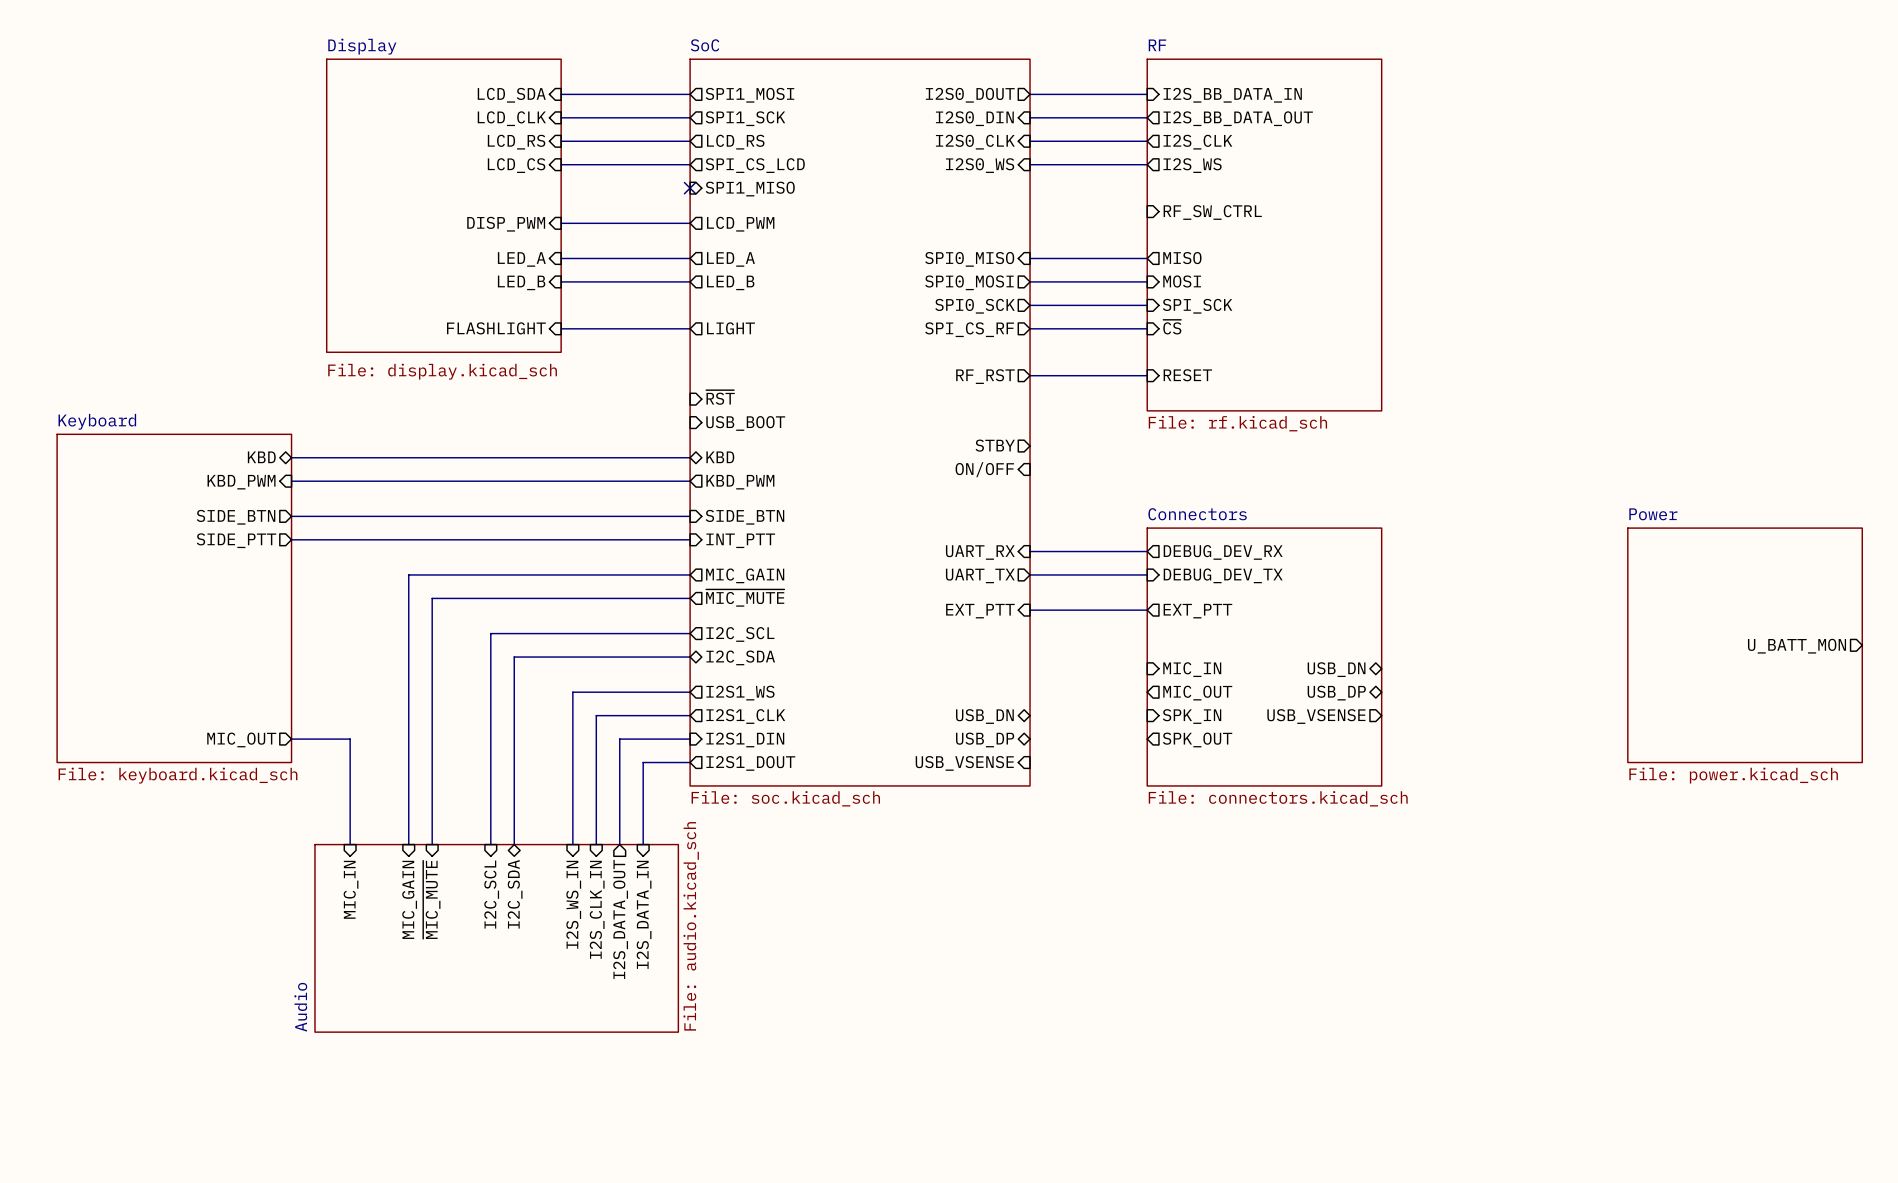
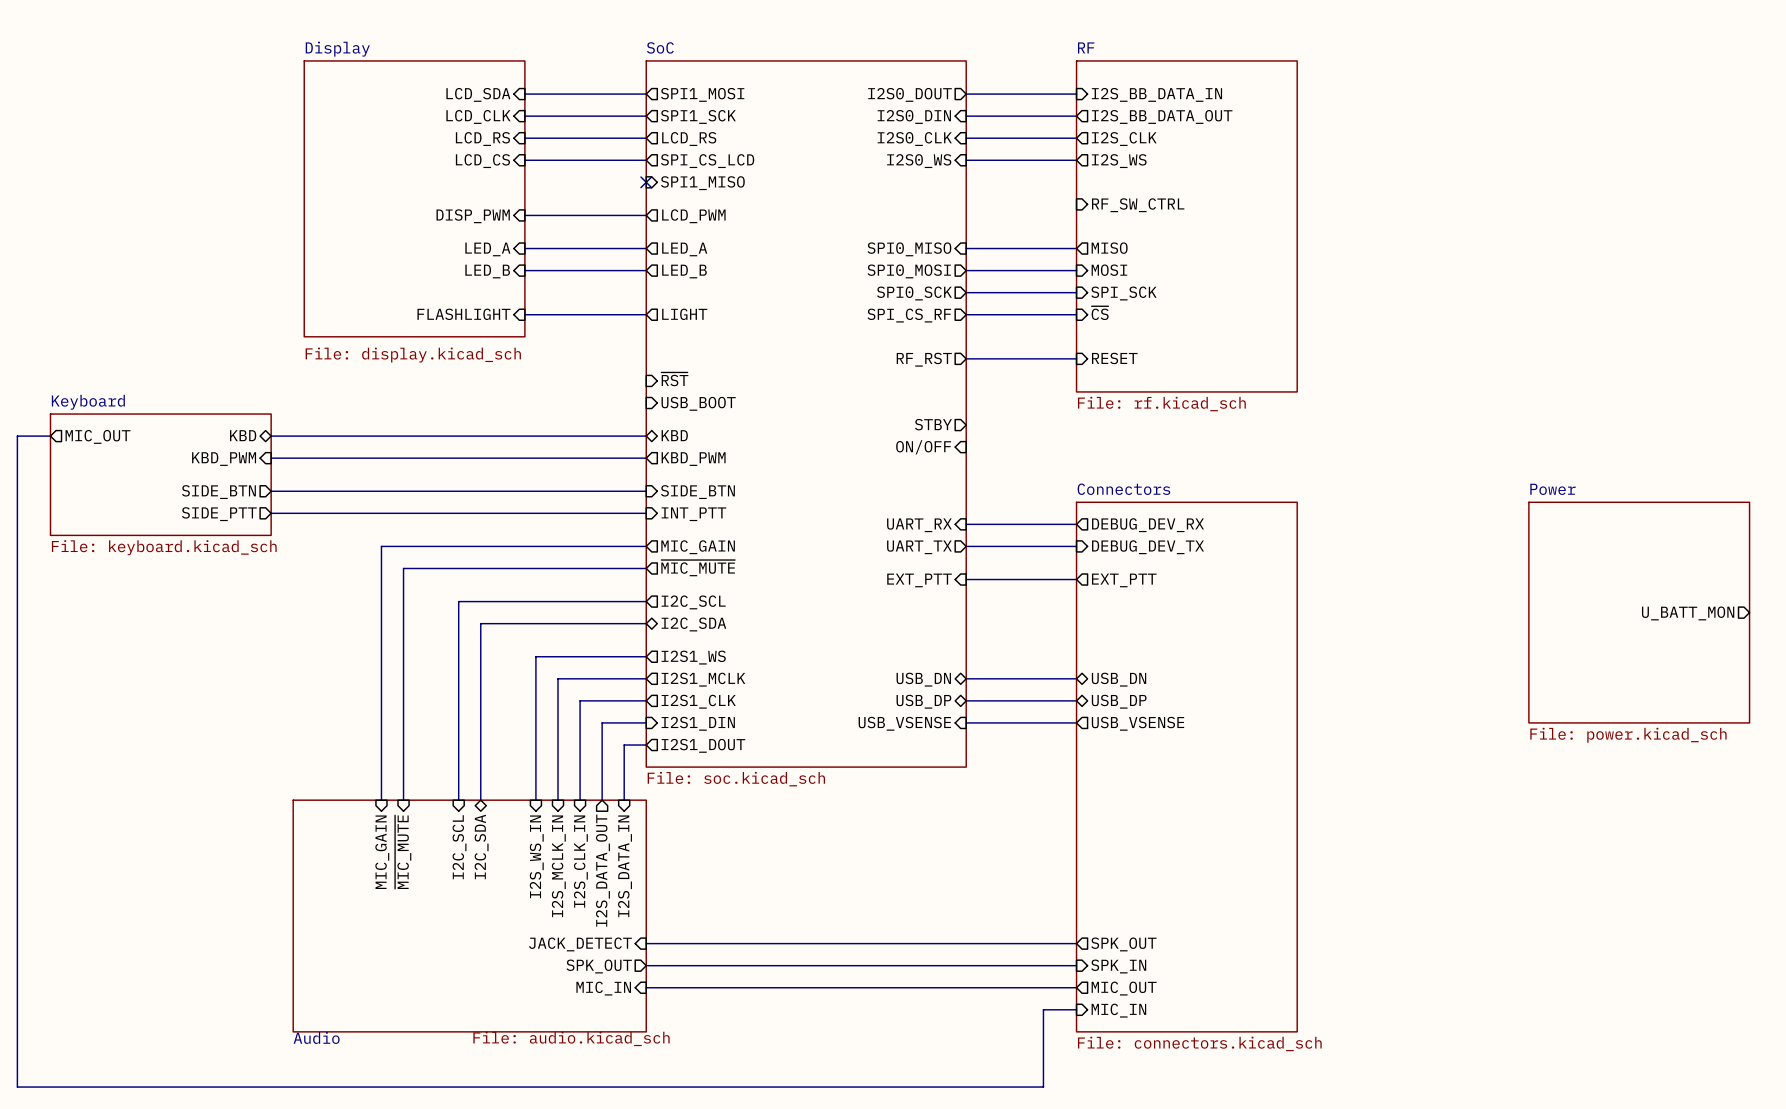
sheet SoC: File: soc.kicad_sch (860, 422) -> none
sheet SoC: none -> File: soc.kicad_sch (806, 414)
wire: none -> (50, 436) (17, 436) (17, 1087) (1043, 1087) (1043, 1009) (1076, 1009)
sheet pin: none -> MIC_OUT (98, 436)
sheet Keyboard: none -> File: keyboard.kicad_sch (160, 474)
sheet Keyboard: File: keyboard.kicad_sch (174, 598) -> none
sheet Connectors: File: connectors.kicad_sch (1264, 657) -> none
sheet pin: MIC_IN (1192, 669) -> none
sheet pin: USB_DN (1336, 669) -> none
sheet pin: MIC_OUT (1197, 693) -> none
sheet pin: USB_DP (1336, 693) -> none
wire: none -> (966, 678) (1076, 678)
sheet pin: I2S1_CLK (745, 716) -> I2S1_MCLK (703, 679)
sheet pin shape: input (1192, 716) -> bidirectional (1119, 679)
sheet pin: SPK_IN (1192, 716) -> USB_DN (1119, 679)
sheet pin rotation: 0° (1316, 716) -> 180° (1137, 723)
sheet pin: MIC_OUT (241, 739) -> none
wire: (291, 739) (350, 739) (350, 844) -> none
sheet pin shape: input (745, 739) -> output (698, 701)
sheet pin: I2S1_DIN (745, 739) -> I2S1_CLK (698, 701)
wire: none -> (966, 700) (1076, 700)
sheet pin shape: output (1197, 739) -> bidirectional (1119, 701)
sheet pin: SPK_OUT (1197, 739) -> USB_DP (1119, 701)
wire: none -> (966, 722) (1076, 722)
sheet pin shape: output (750, 763) -> input (698, 723)
sheet pin: I2S1_DOUT (750, 763) -> I2S1_DIN (698, 723)
wire: none -> (646, 745) (624, 745) (624, 800)
sheet pin: none -> I2S1_DOUT (703, 745)
sheet Connectors: none -> File: connectors.kicad_sch (1186, 767)
sheet pin: MIC_IN (351, 889) -> none
sheet pin: I2S_CLK_IN (597, 909) -> I2S_MCLK_IN (558, 866)
sheet pin shape: input (644, 914) -> output (602, 870)
sheet pin: I2S_DATA_IN (644, 914) -> I2S_DATA_OUT (602, 870)
sheet pin: none -> I2S_DATA_IN (625, 866)
sheet pin shape: output (620, 919) -> input (580, 861)
sheet pin: I2S_DATA_OUT (620, 919) -> I2S_CLK_IN (580, 861)
sheet Audio: File: audio.kicad_sch (496, 938) -> none
sheet Audio: none -> File: audio.kicad_sch (469, 916)
wire: none -> (646, 943) (1076, 943)
sheet pin: none -> JACK_DETECT (580, 944)
sheet pin: none -> SPK_OUT (1123, 944)
wire: none -> (646, 965) (1076, 965)
sheet pin: none -> SPK_OUT (599, 966)
sheet pin: none -> SPK_IN (1118, 966)
wire: none -> (646, 987) (1076, 987)
sheet pin: none -> MIC_IN (603, 988)
sheet pin: none -> MIC_OUT (1124, 988)
sheet pin: none -> MIC_IN (1118, 1010)

